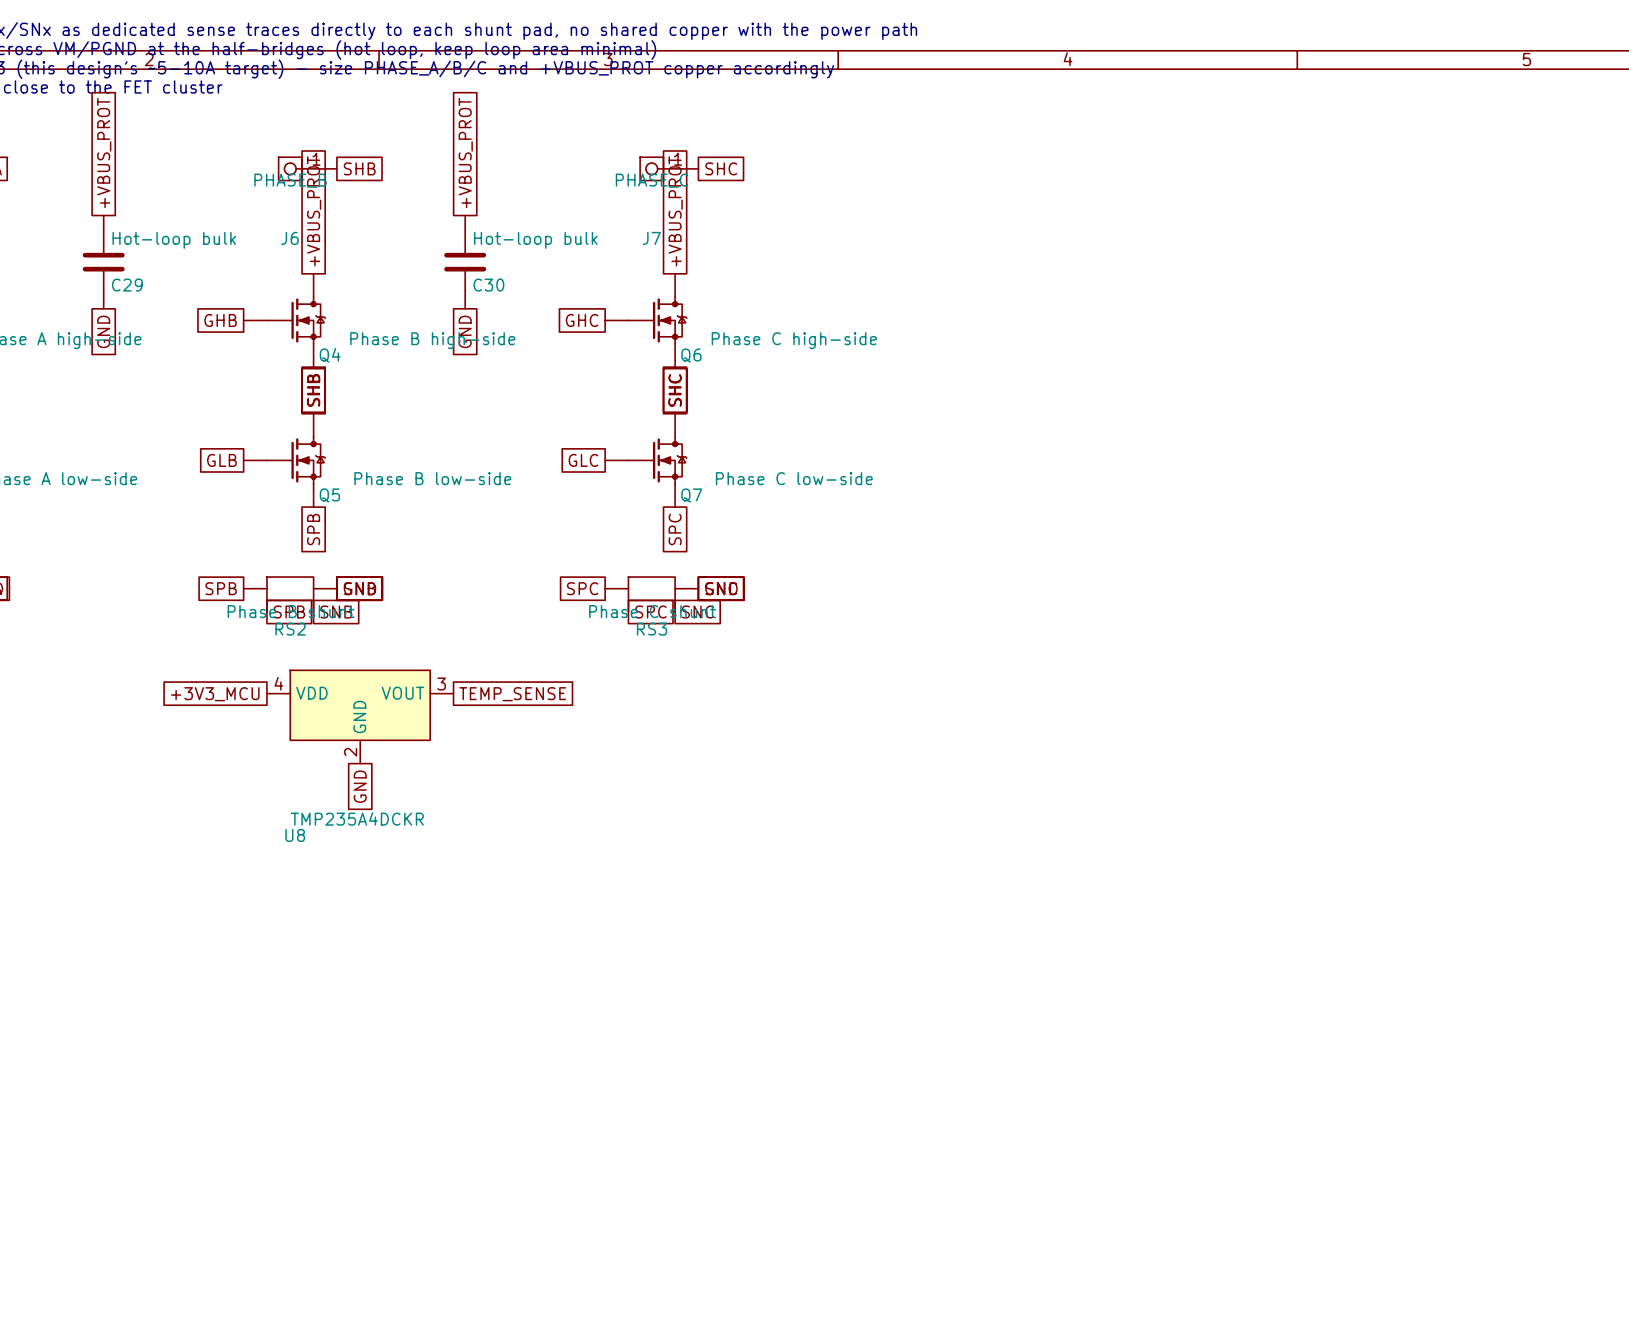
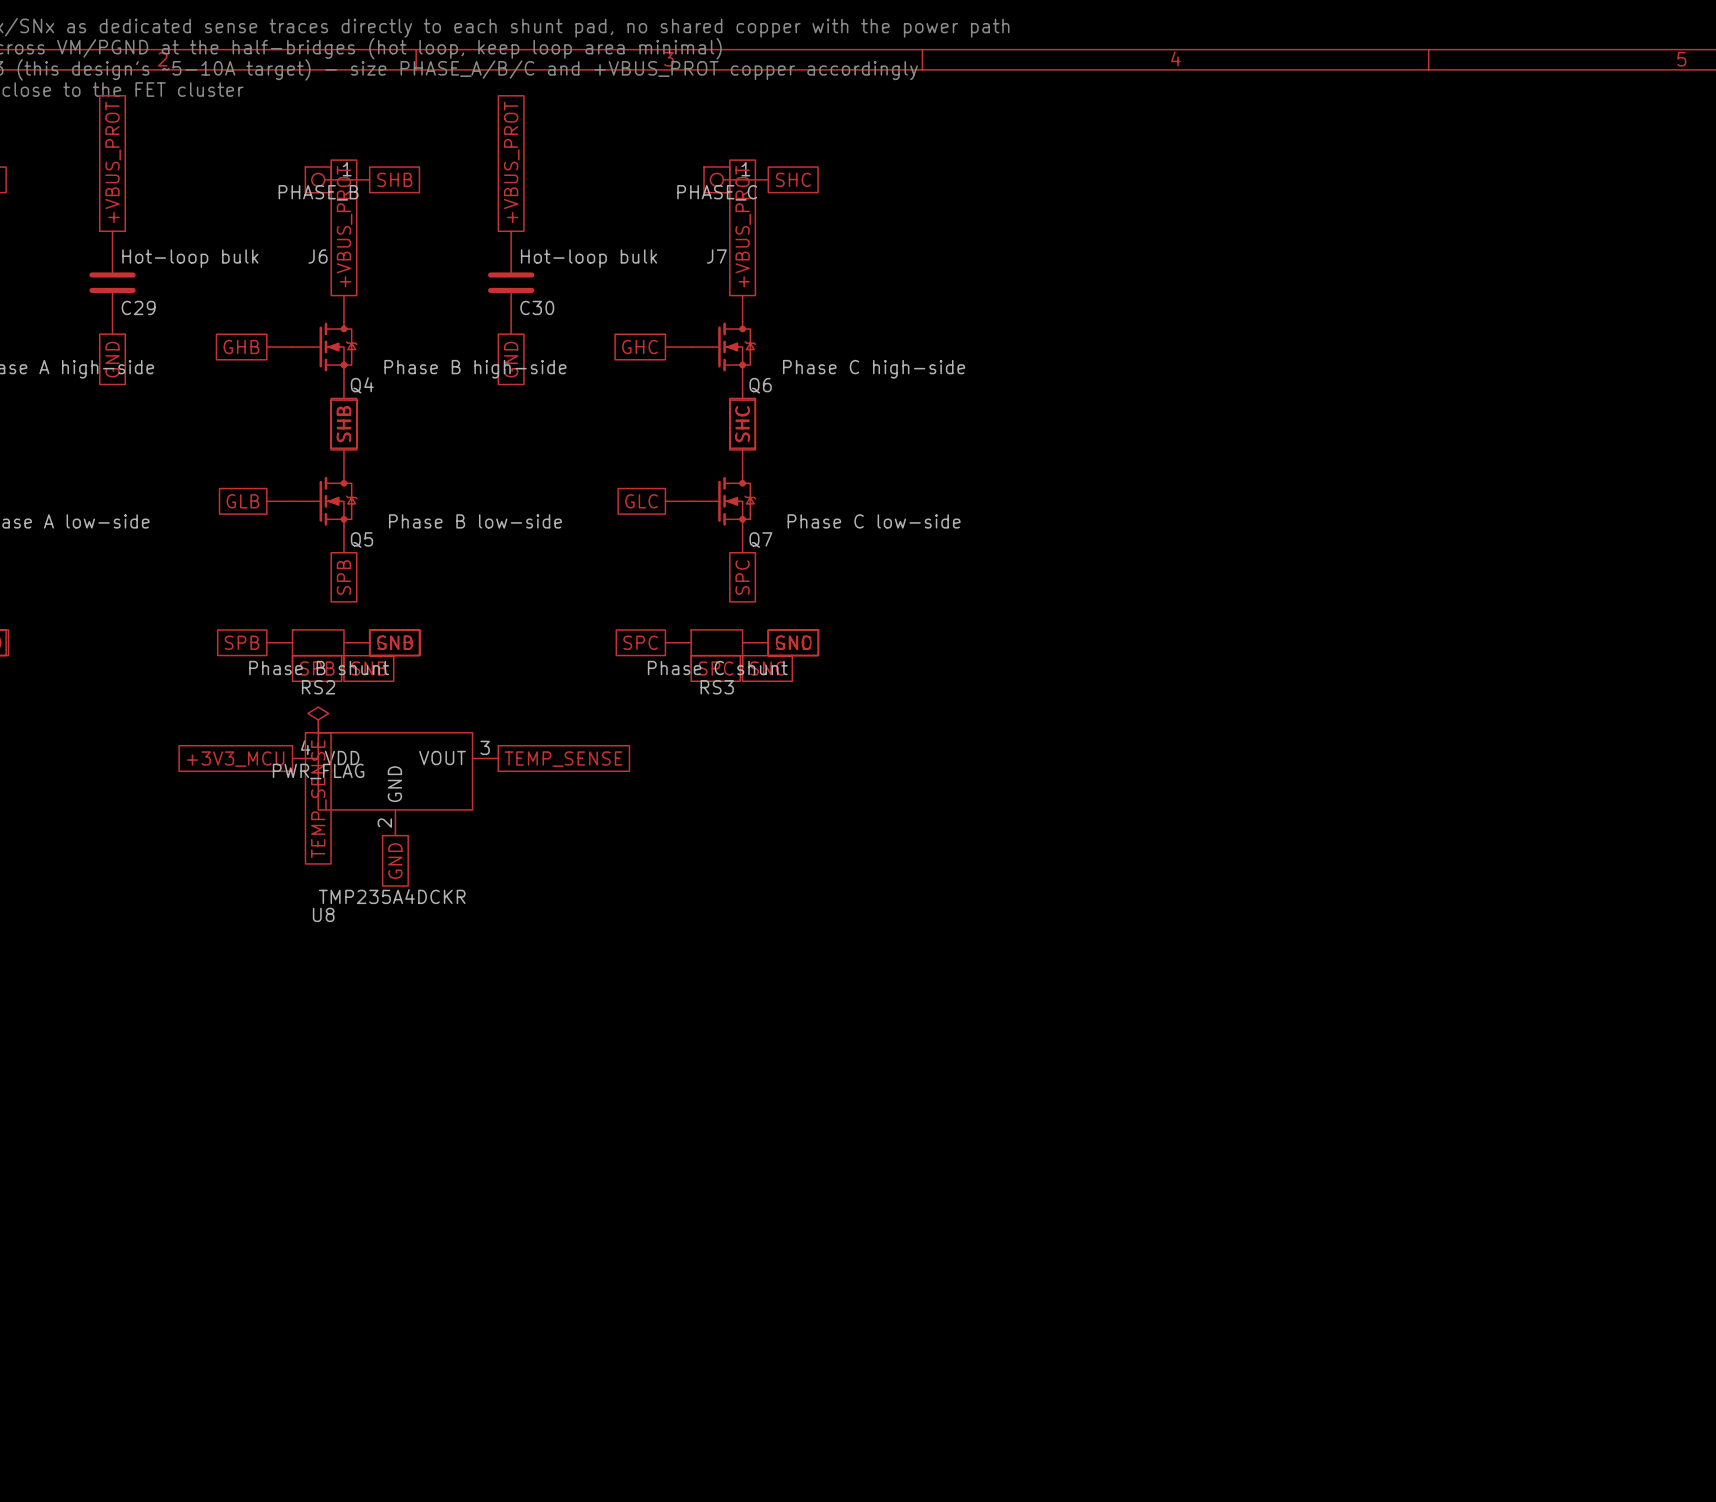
power symbol: none -> PWR_FLAG (318, 719)
global label: none -> TEMP_SENSE (318, 799)

